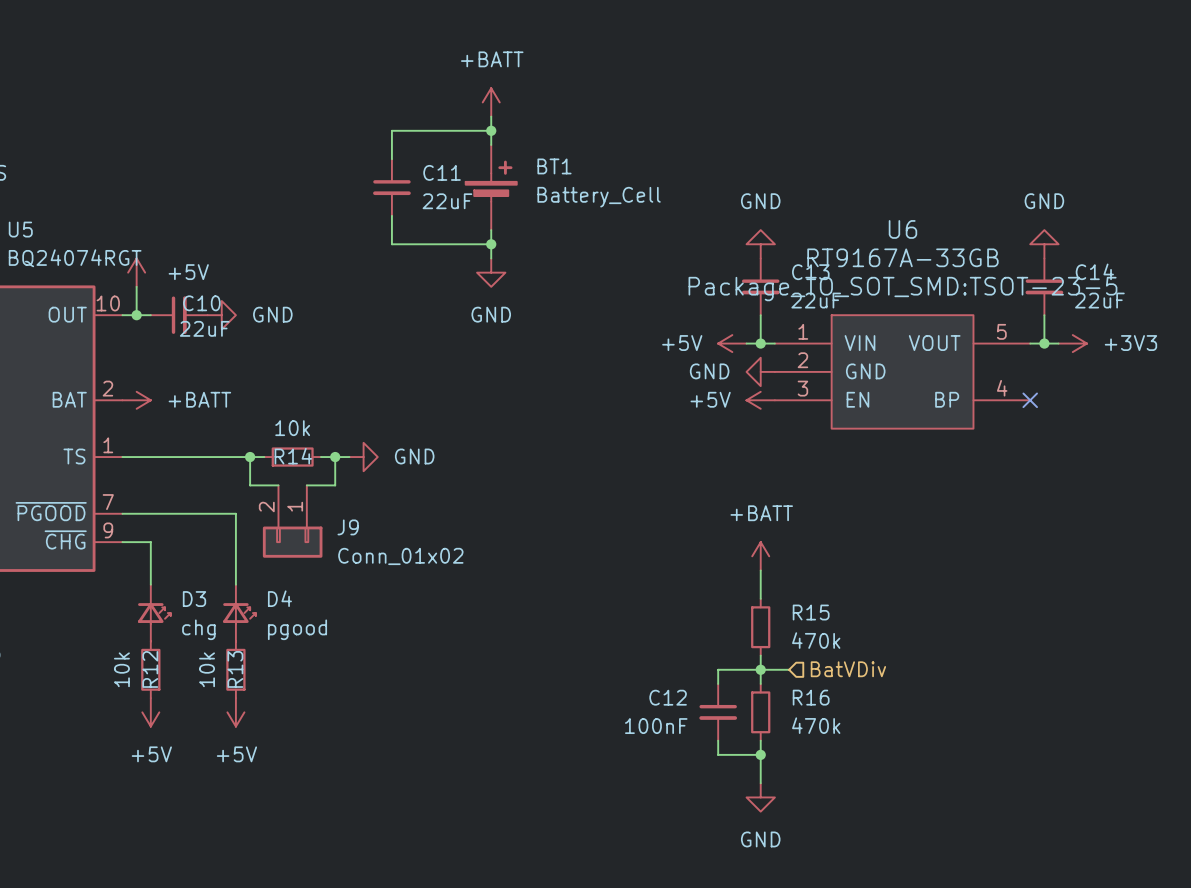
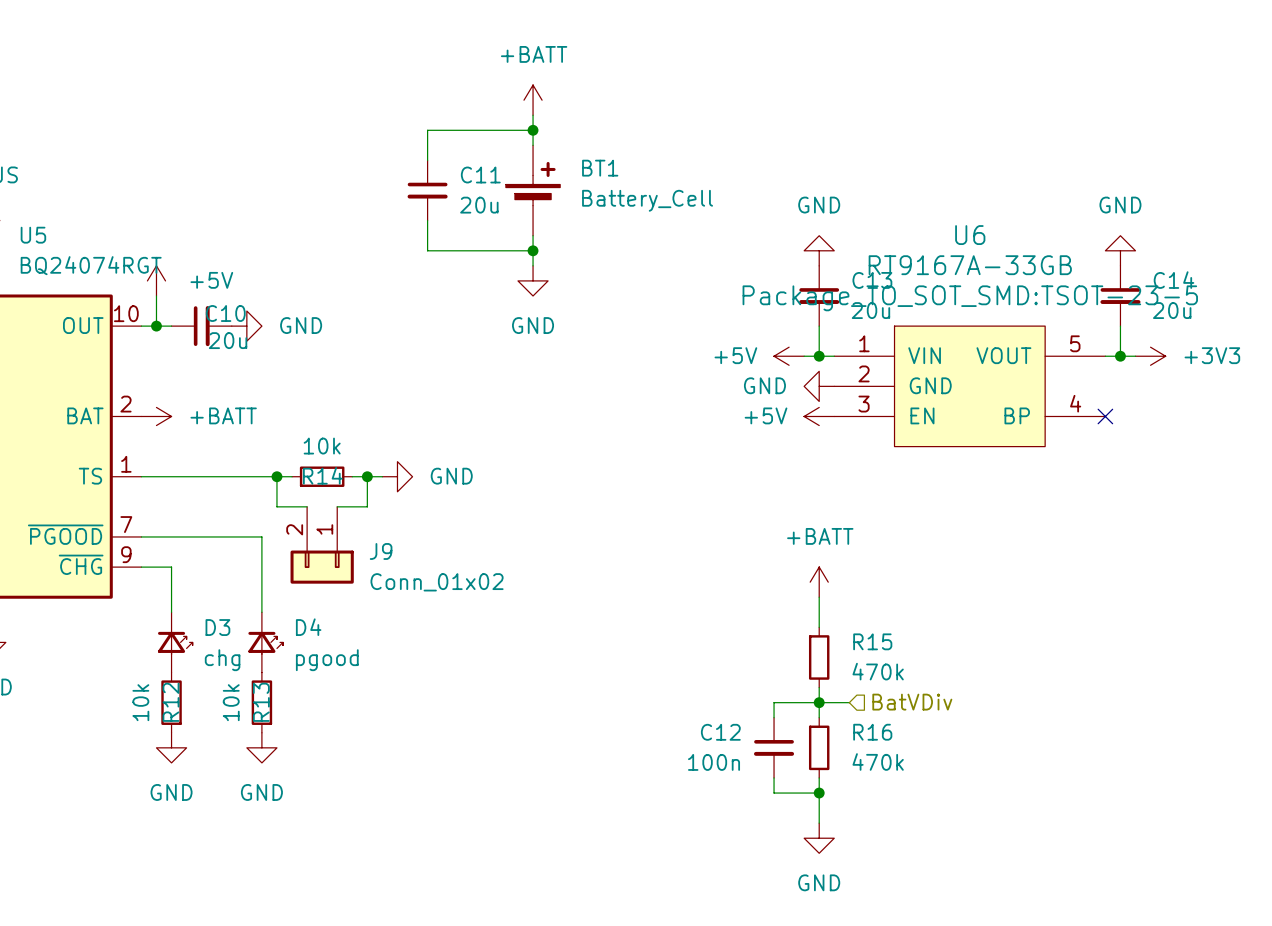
C11 value: 22uF (447, 201) -> 20u (479, 205)
C13 value: 22uF (816, 300) -> 20u (870, 310)
C14 value: 22uF (1099, 300) -> 20u (1172, 310)
C10 value: 22uF (204, 328) -> 20u (228, 340)
power symbol: +5V (150, 712) -> GND (171, 747)
power symbol: +5V (235, 712) -> GND (261, 747)
C12 value: 100nF (656, 726) -> 100n (714, 762)

